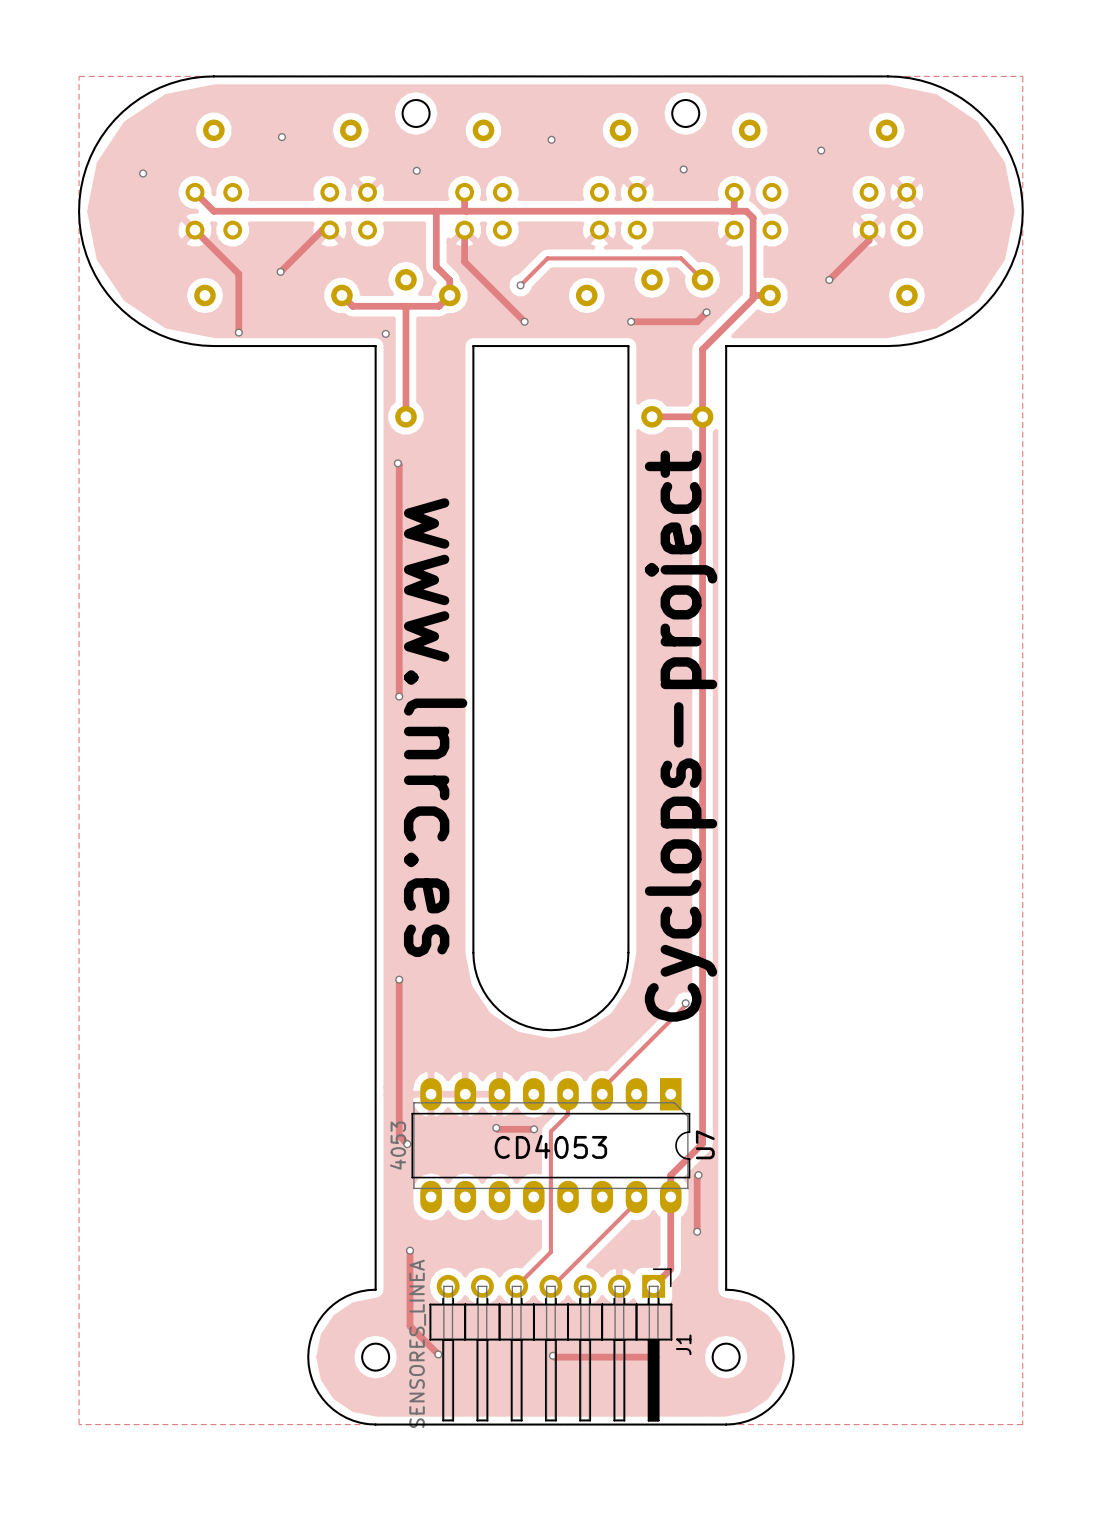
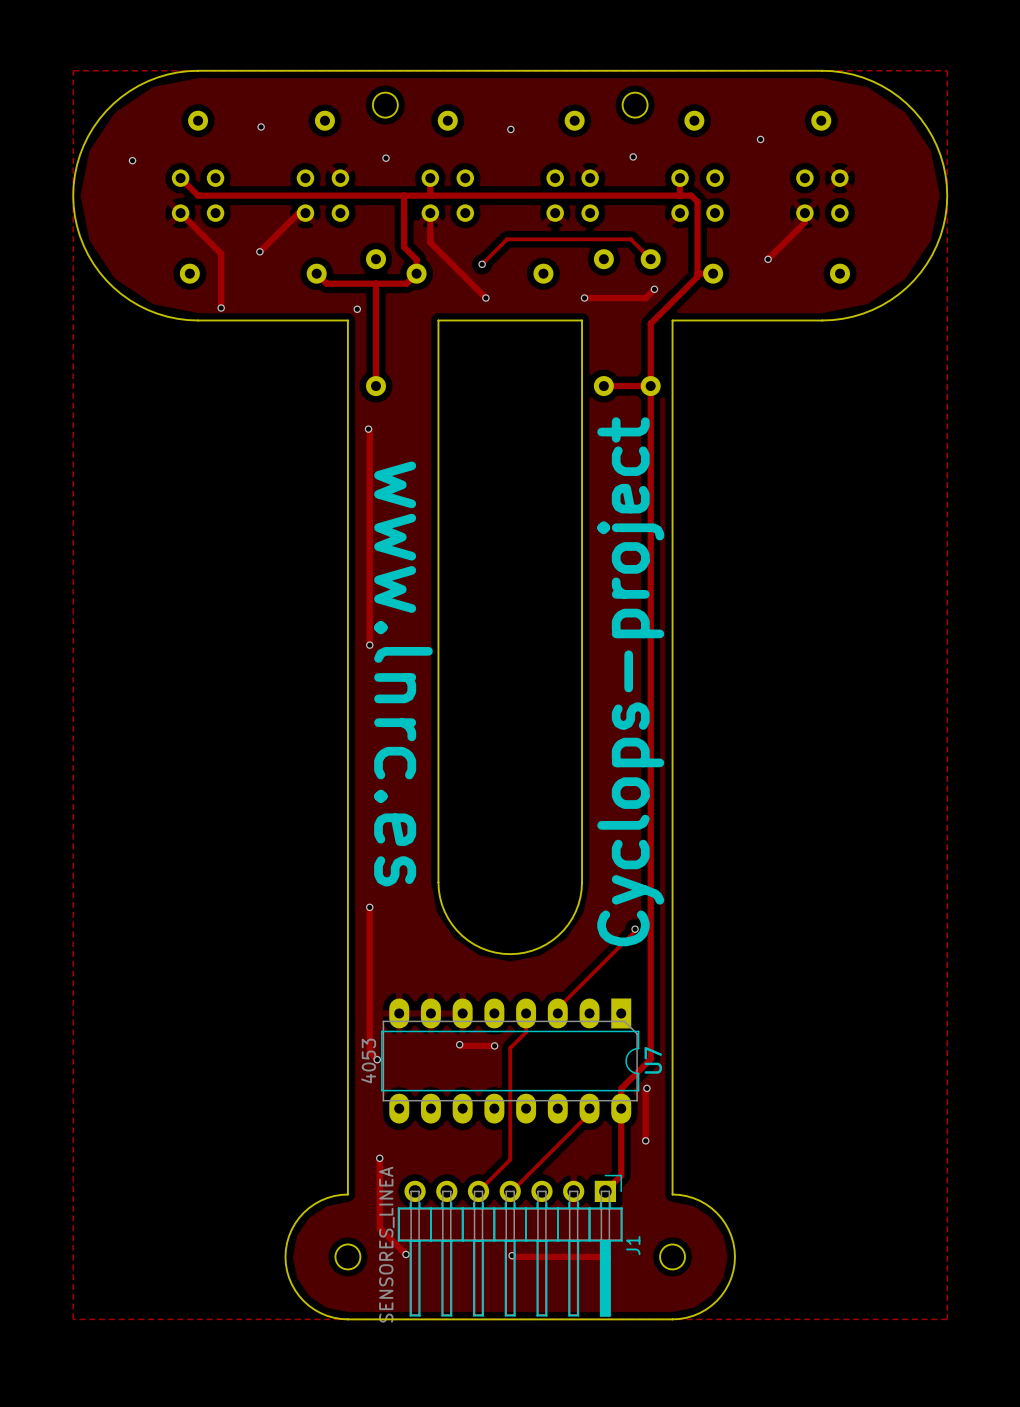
text: CD4053 (550, 1146) -> none

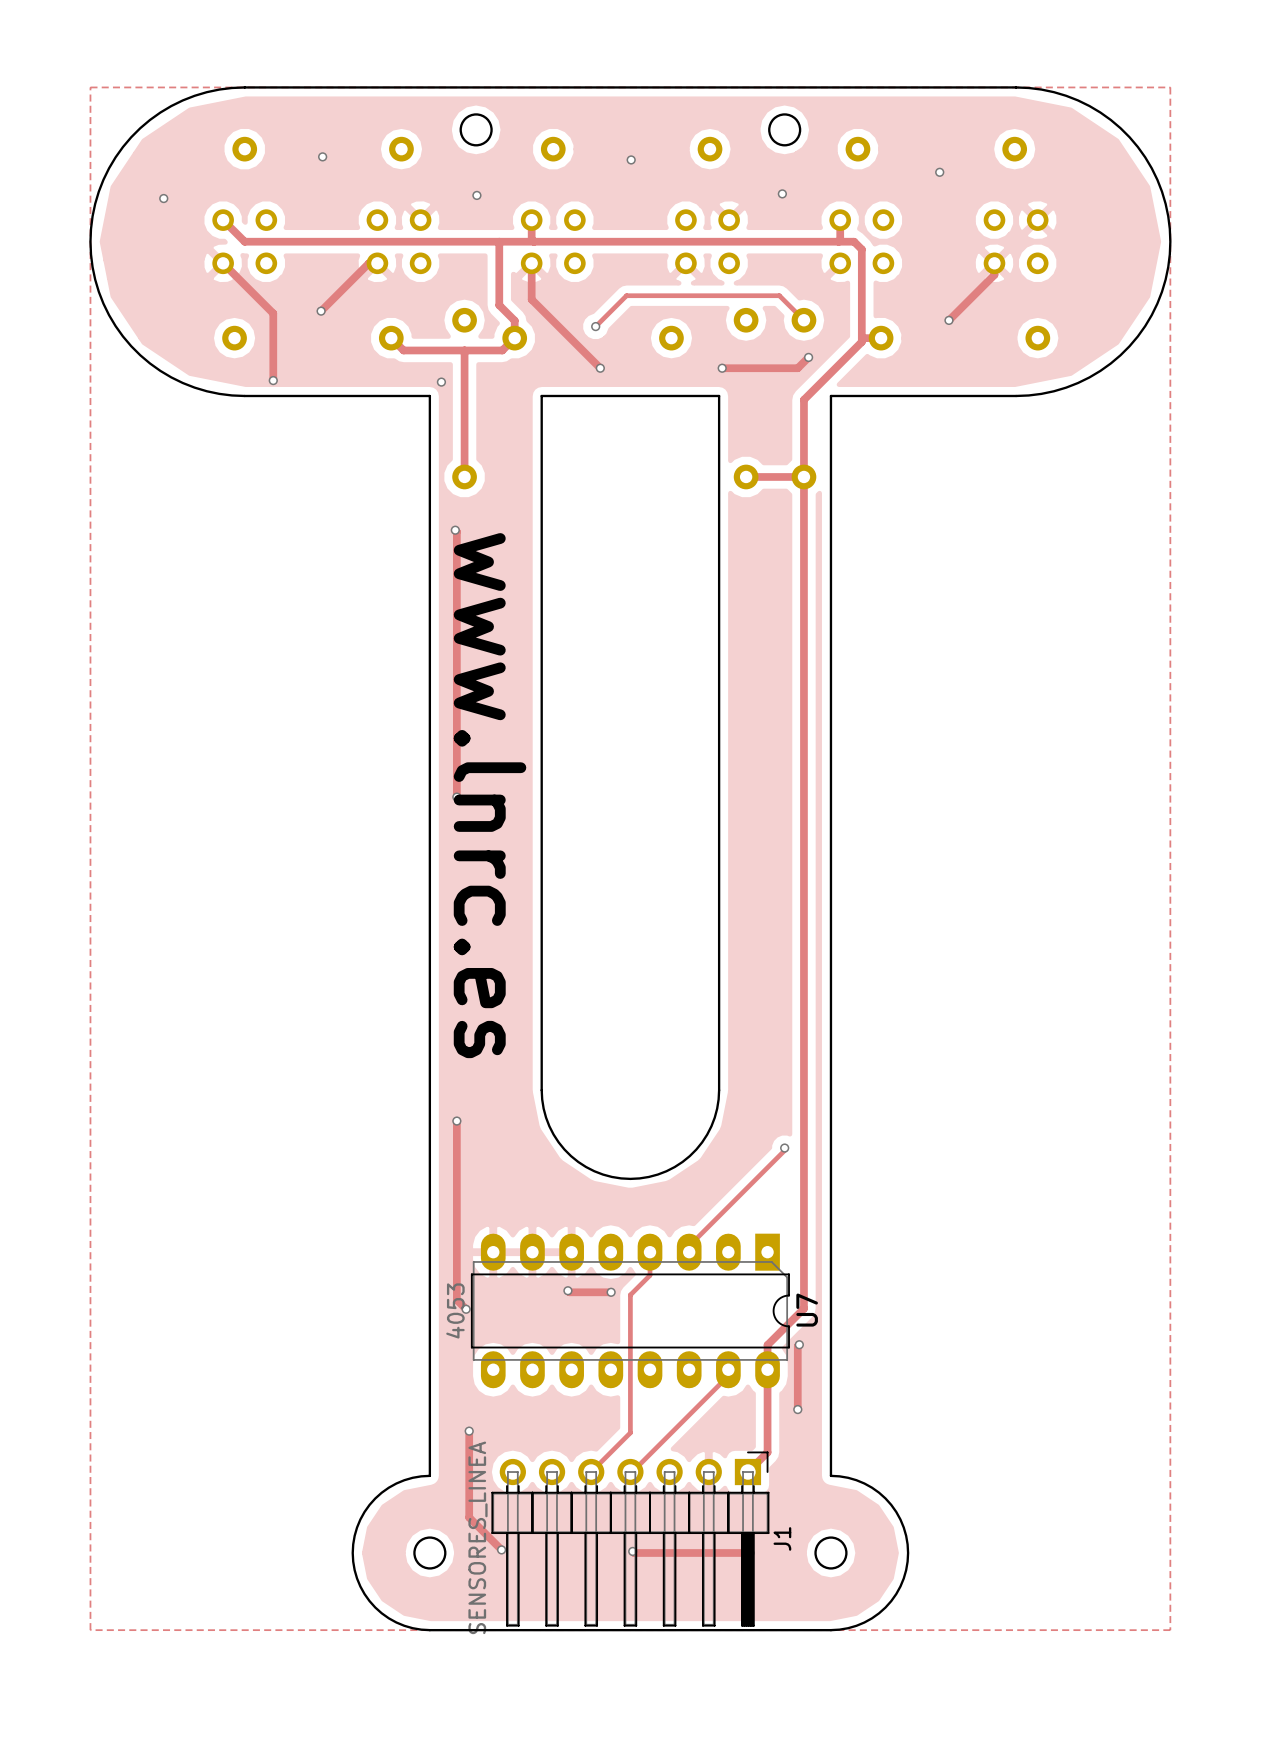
text position: www.lnrc.es (403, 673) -> www.lnrc.es (490, 795)
text: Cyclops-project (630, 681) -> none

